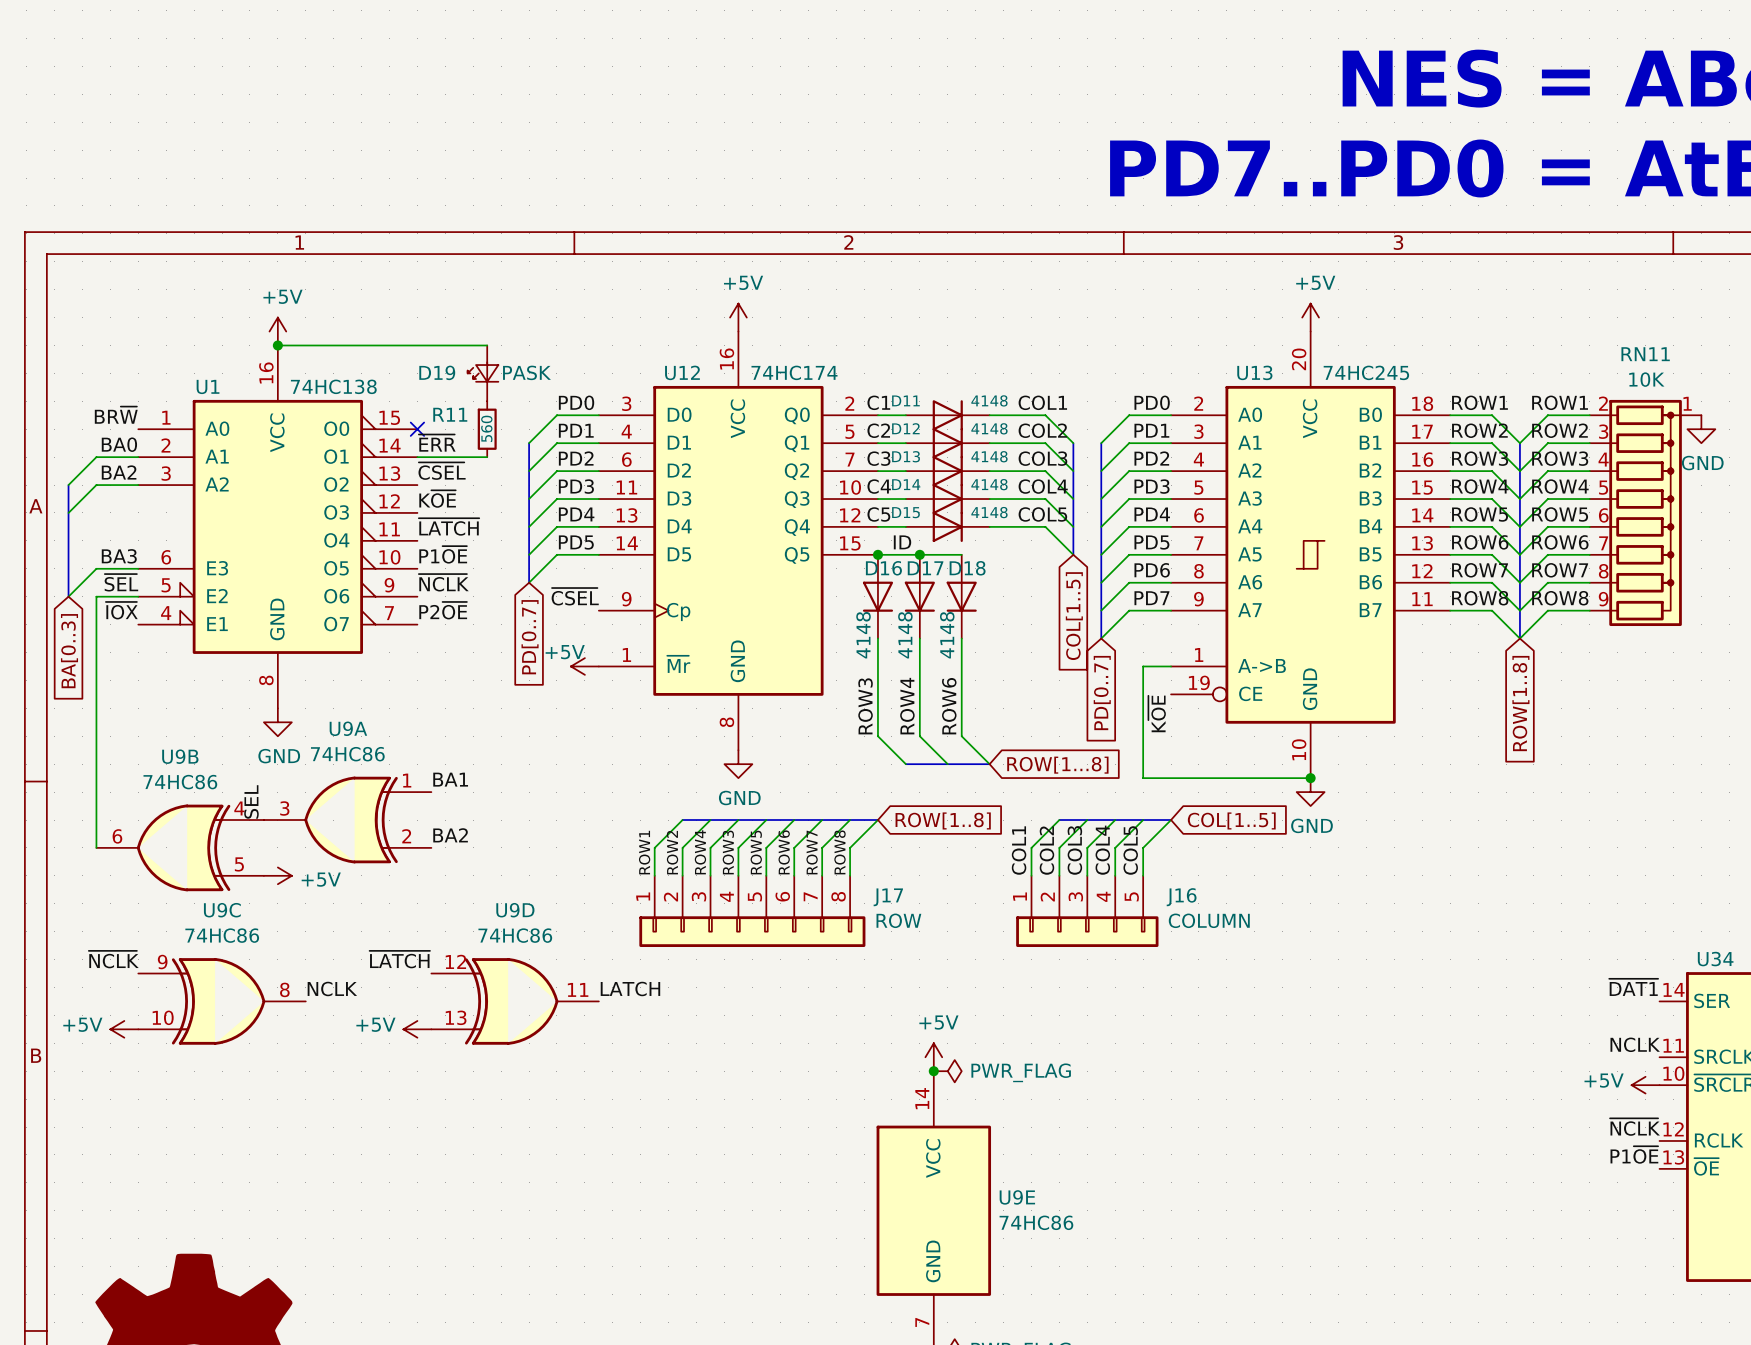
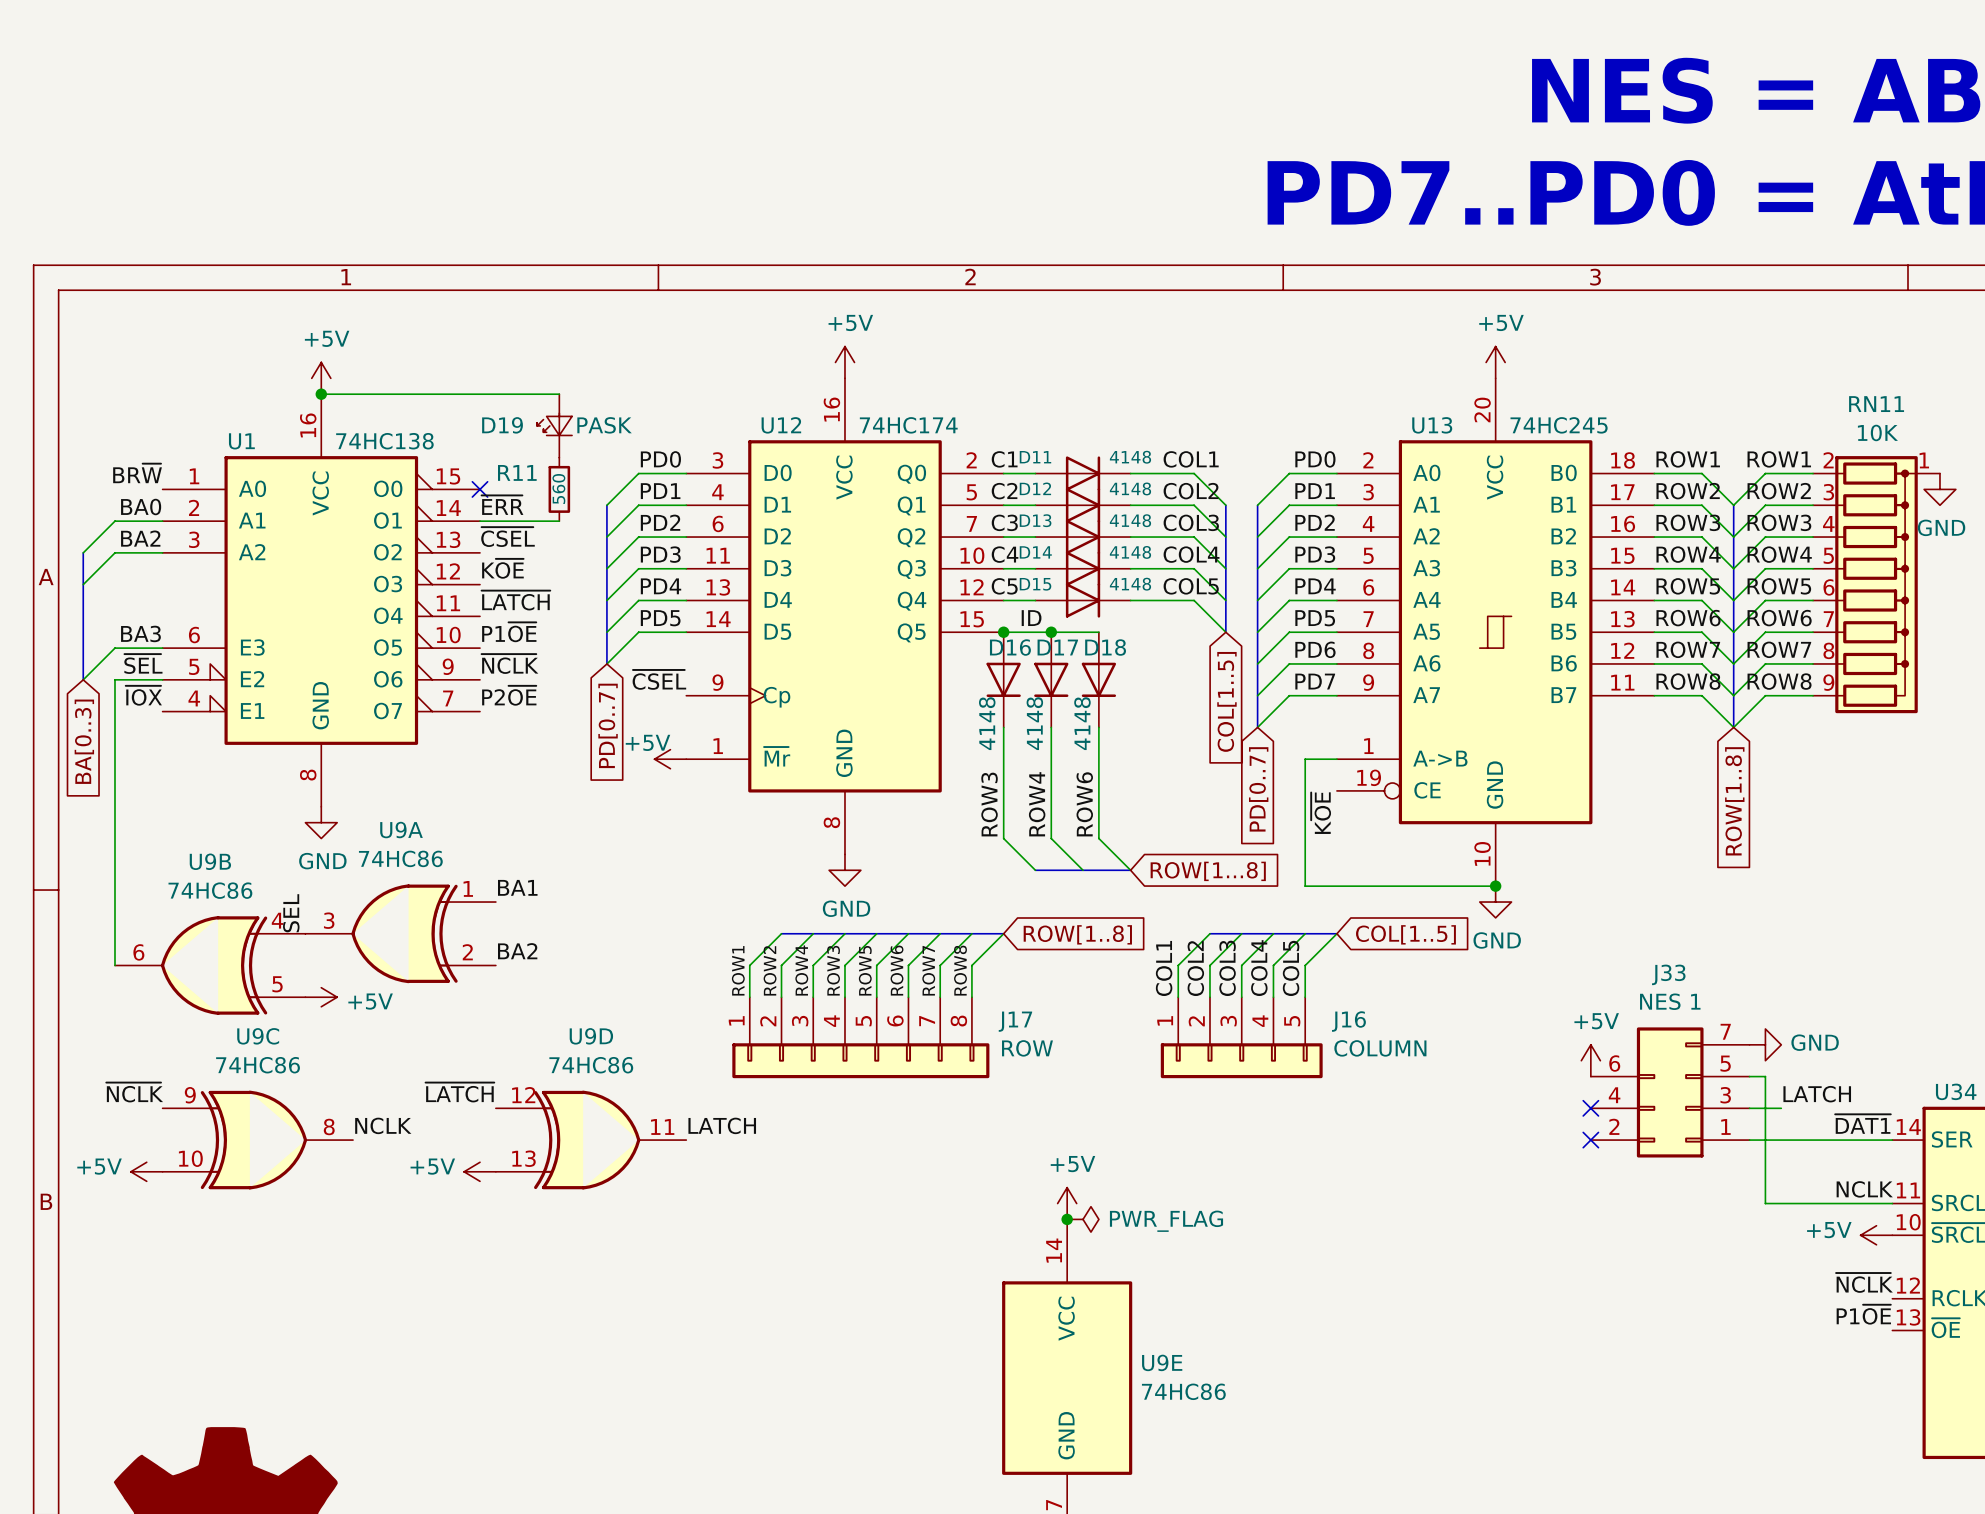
power symbol: none -> GND (1765, 1044)
power symbol: none -> +5V (1590, 1060)
wire: none -> (1749, 1076) (1765, 1076) (1765, 1203) (1892, 1203)
J33: none -> NES 1 (1670, 1092)
label: none -> LATCH (1817, 1094)
no-connect mark: none -> (1590, 1108)
wire: none -> (1749, 1108) (1781, 1108)
no-connect mark: none -> (1590, 1140)
wire: none -> (1749, 1140) (1892, 1140)

